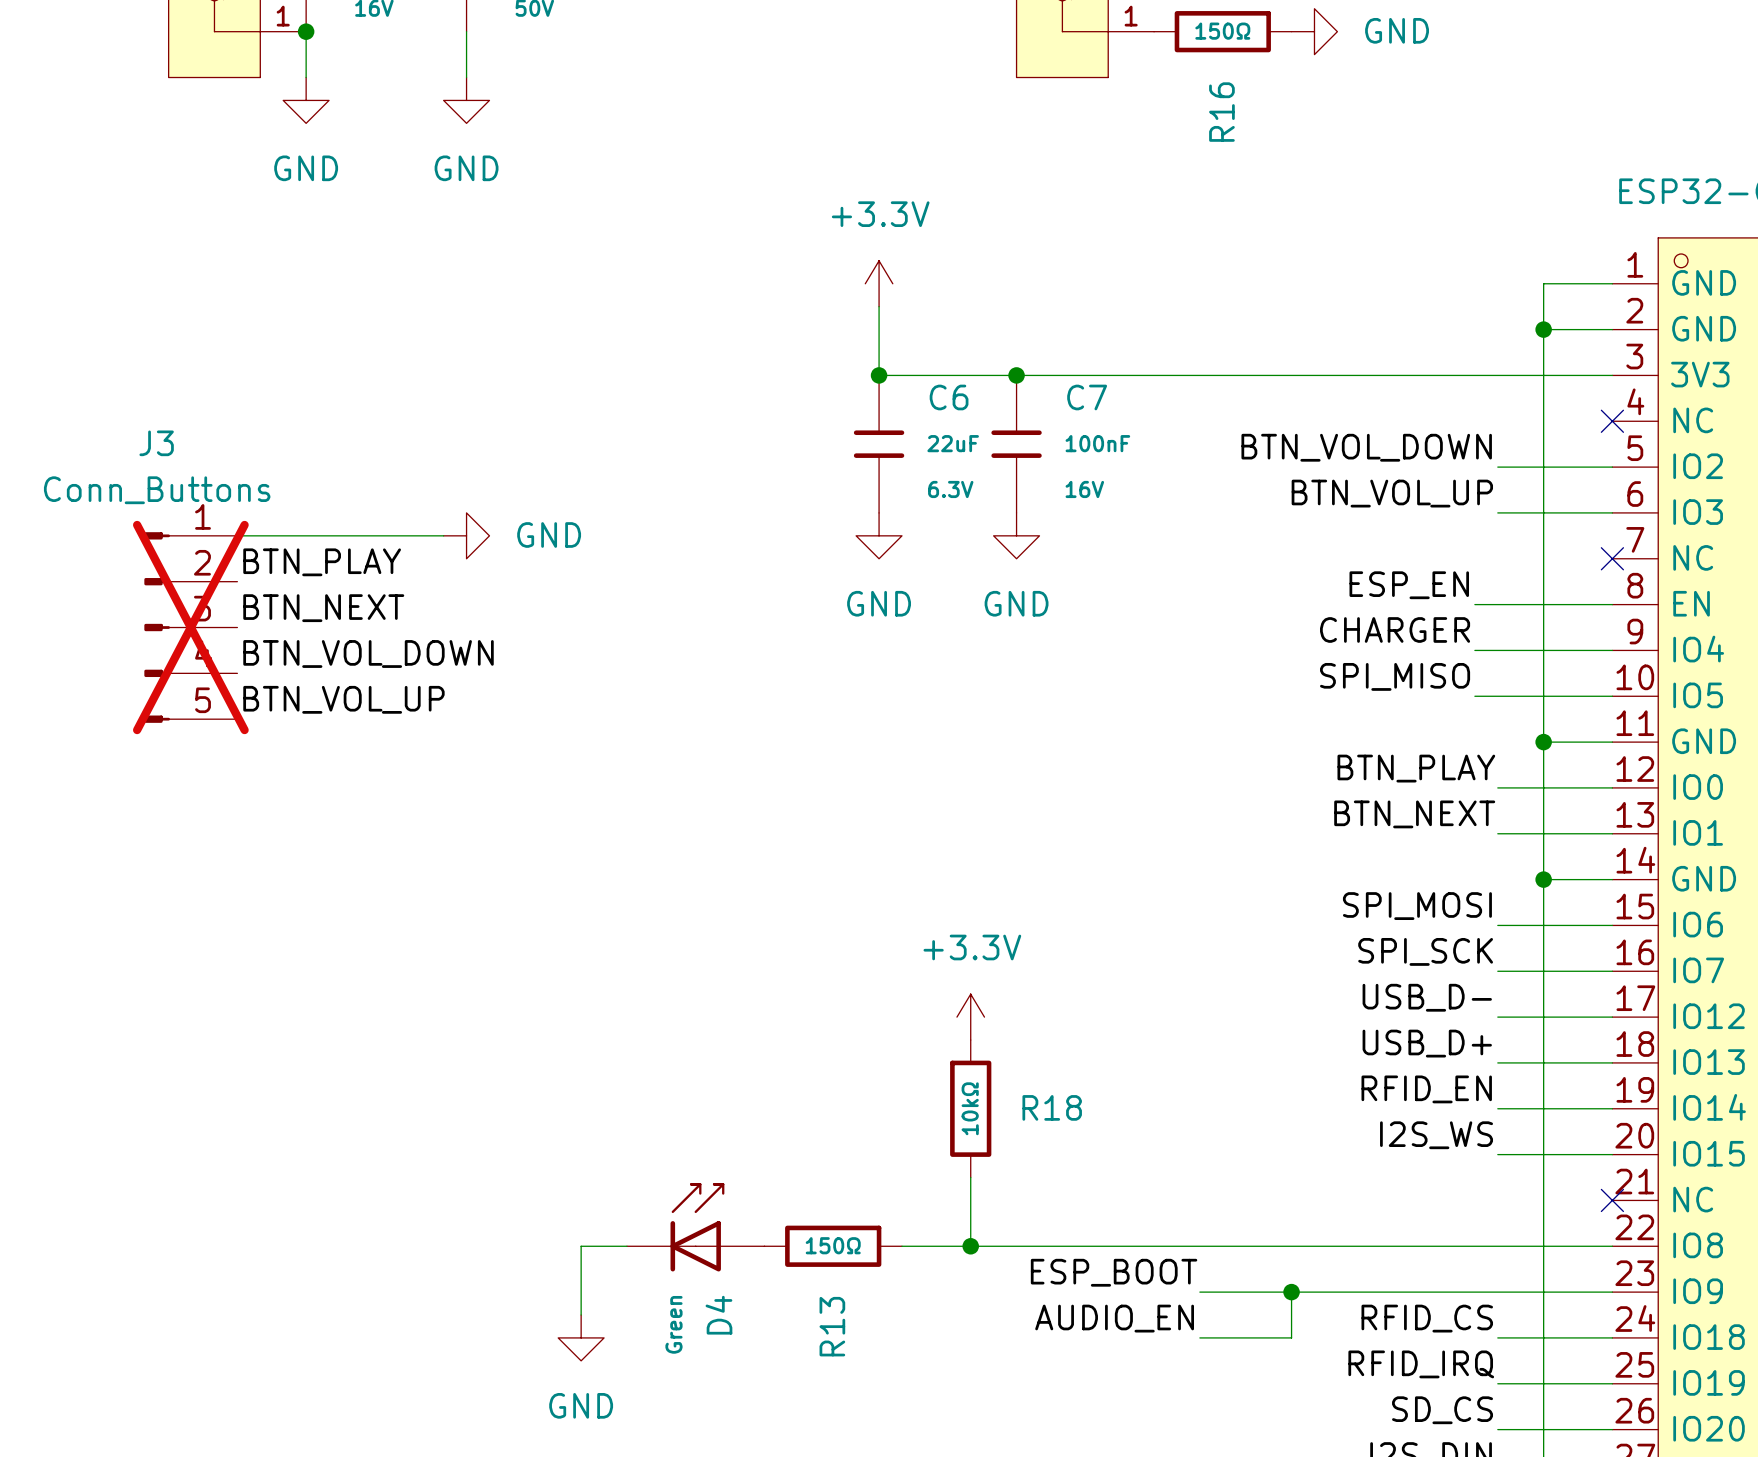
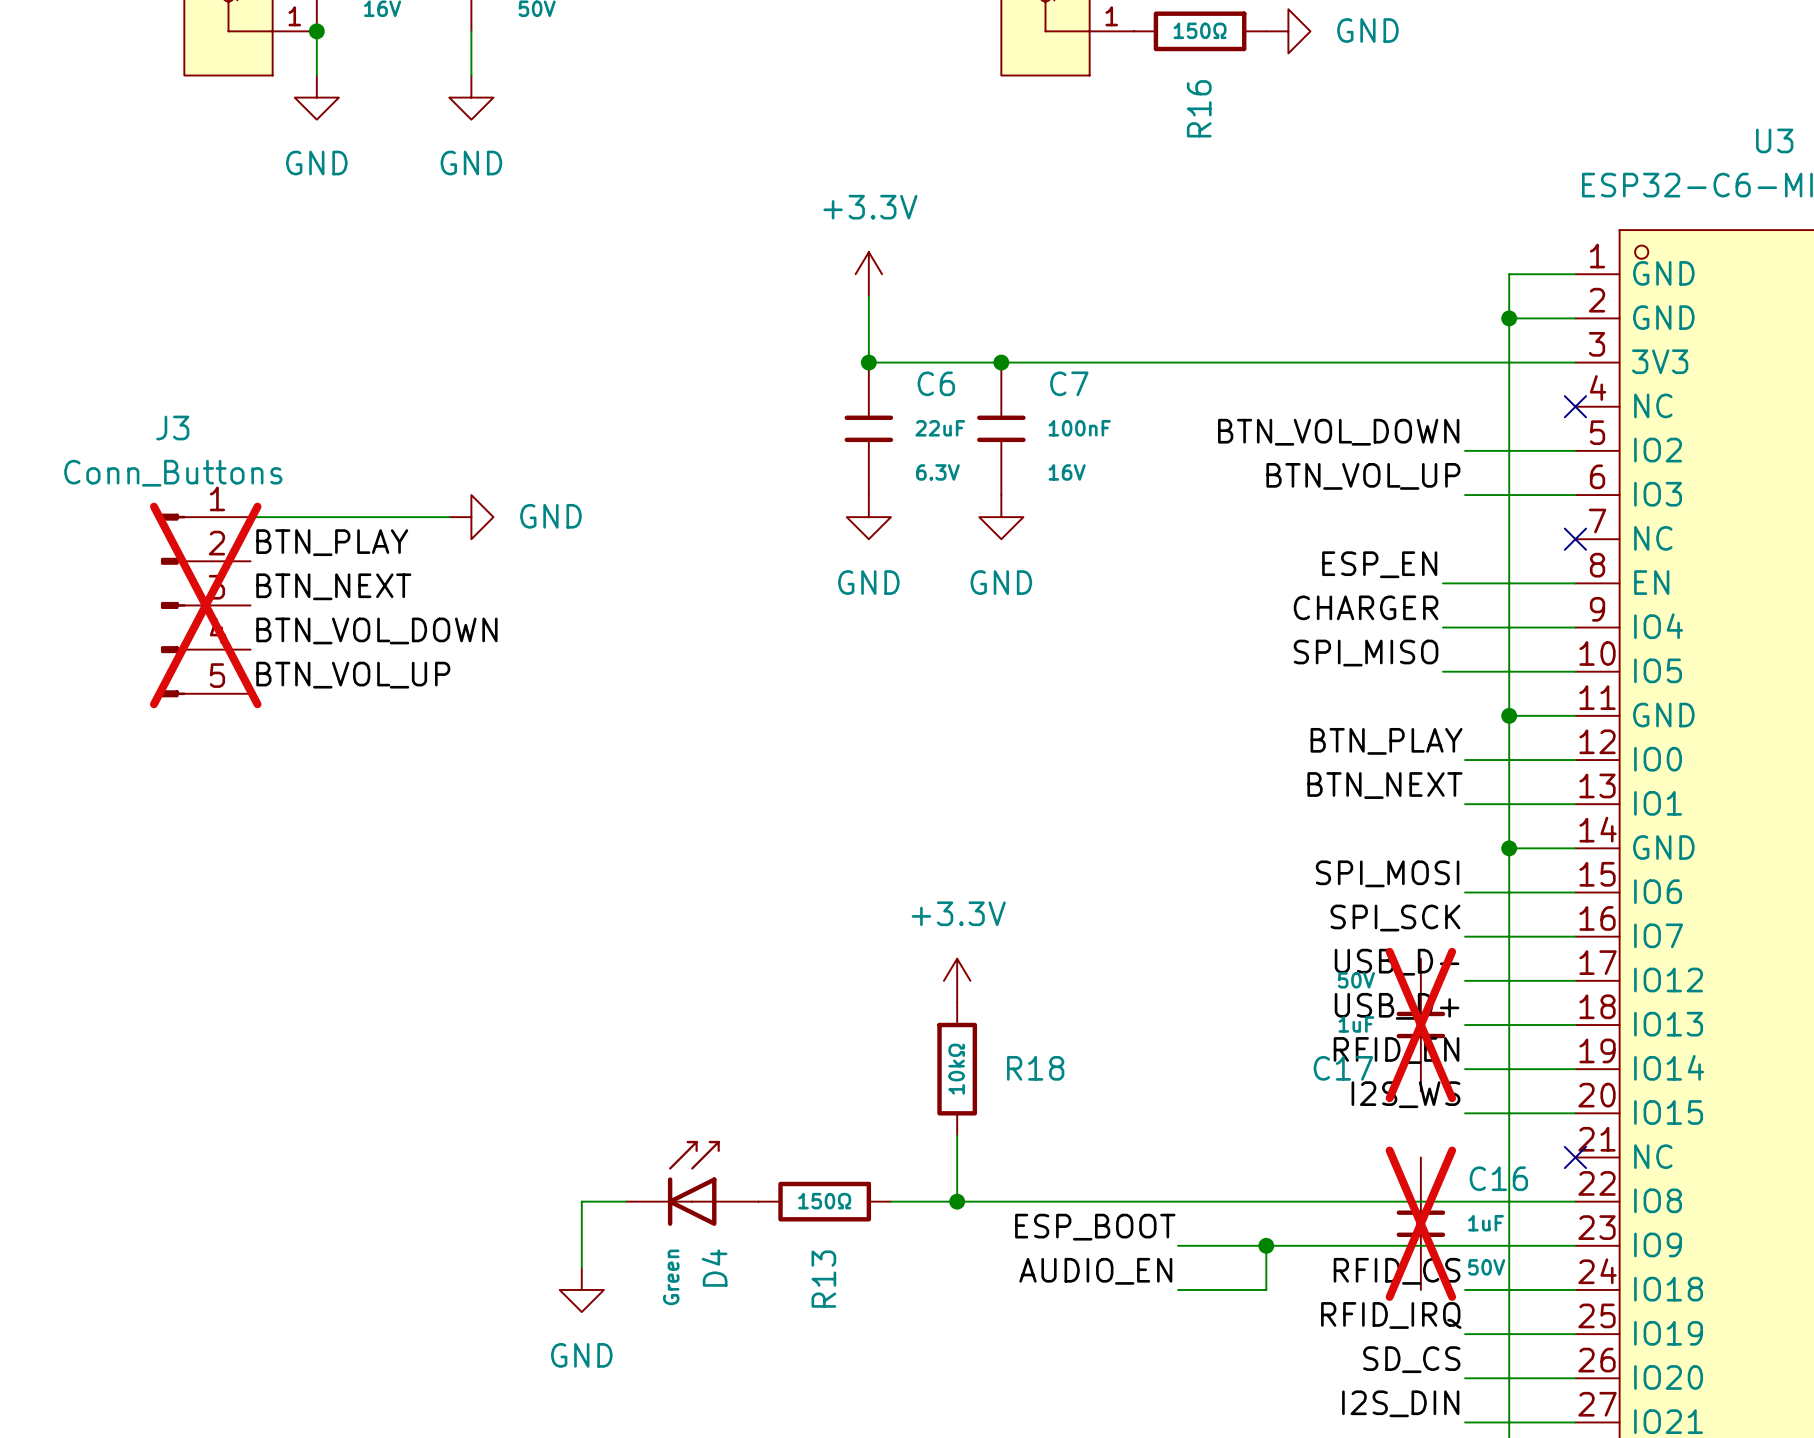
C17: none -> 1uF (1420, 1025)
C16: none -> 1uF (1420, 1223)

